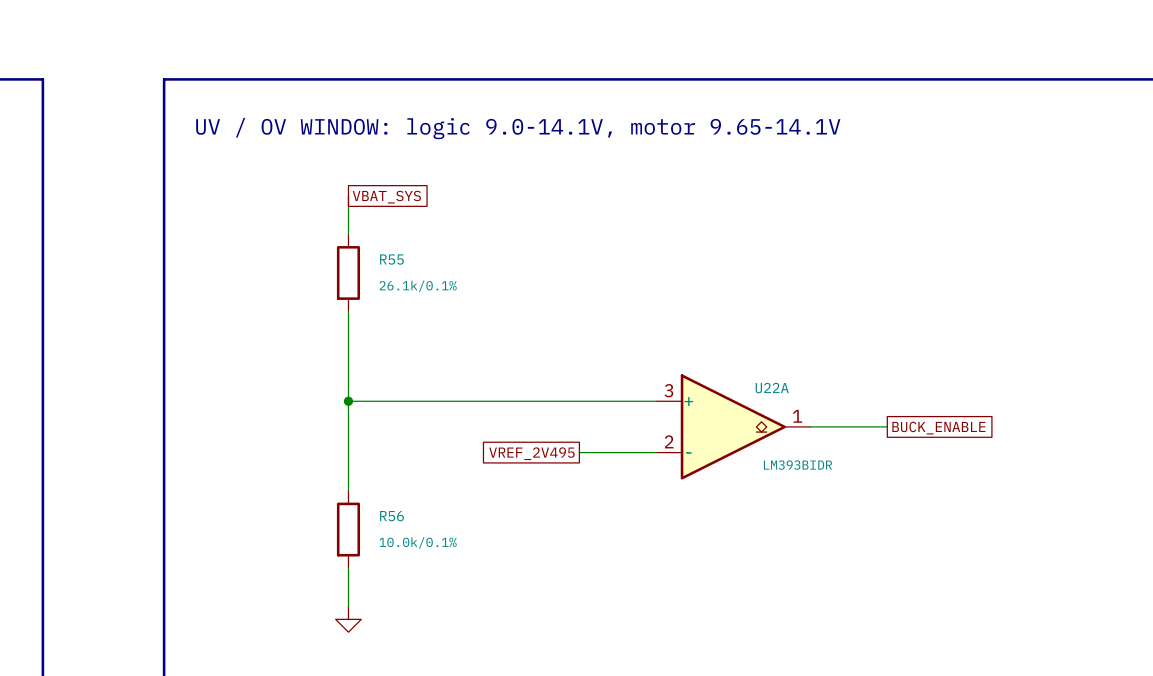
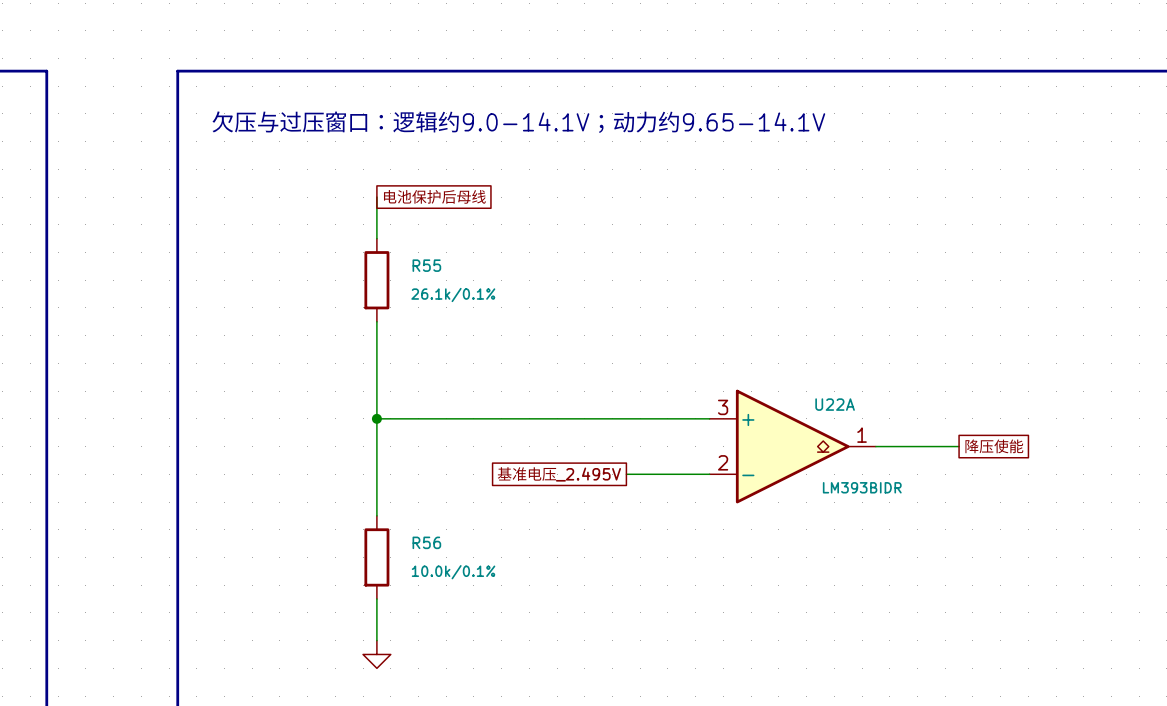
text: UV / OV WINDOW: logic 9.0-14.1V, motor 9.65-14.1V (518, 128) -> 欠压与过压窗口：逻辑约9.0-14.1V；动力约9.65-14.1V (518, 122)
global label: VBAT_SYS (386, 197) -> 电池保护后母线 (434, 196)
global label: BUCK_ENABLE (938, 428) -> 降压使能 (994, 446)
global label: VREF_2V495 (531, 453) -> 基准电压_2.495V (558, 474)

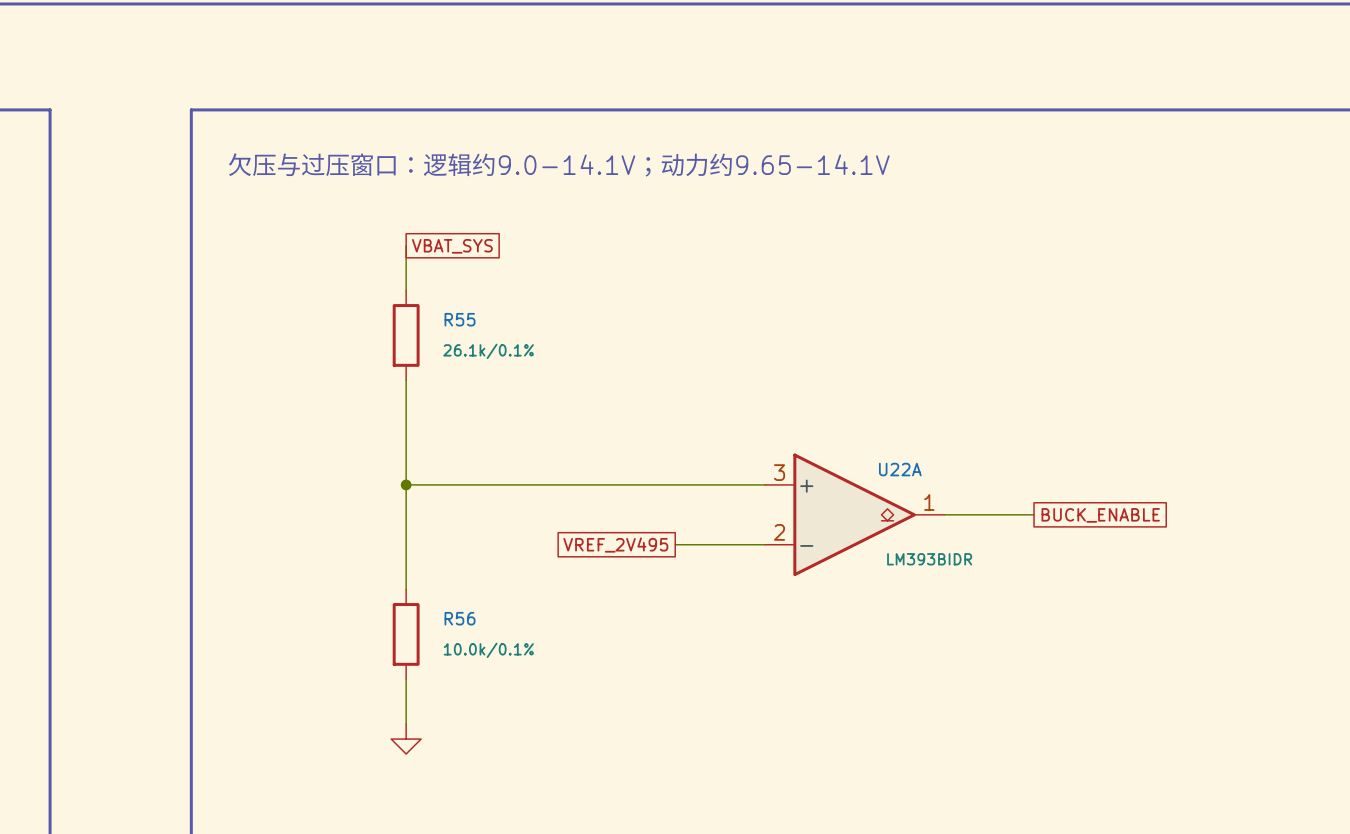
global label: 电池保护后母线 (434, 196) -> VBAT_SYS (452, 246)
global label: 降压使能 (994, 446) -> BUCK_ENABLE (1100, 515)
global label: 基准电压_2.495V (558, 474) -> VREF_2V495 (615, 545)

